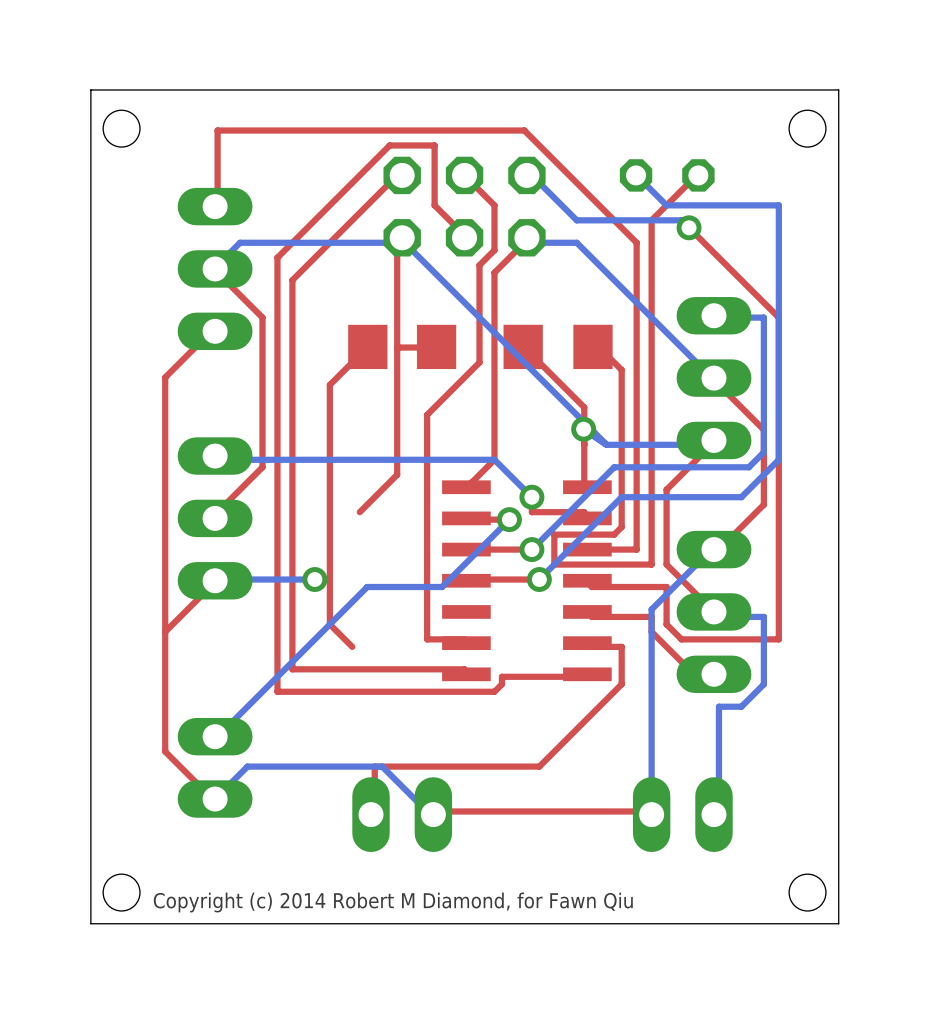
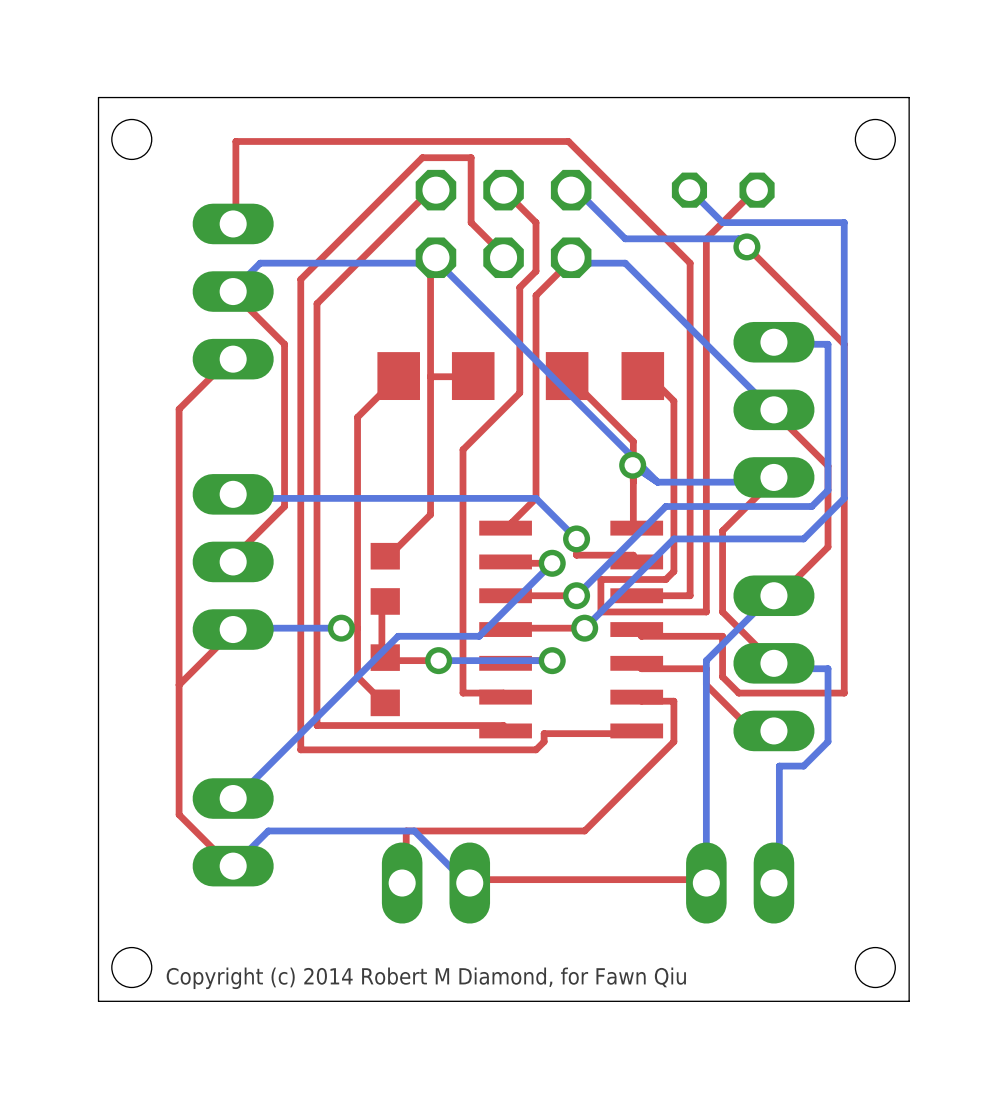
part: none -> (385, 578)
top track: none -> (385, 601) (381, 603) (381, 652) (385, 657) (390, 660) (438, 660)
via: none -> (438, 660)
bottom track: none -> (552, 660) (438, 660)
via: none -> (552, 660)
part: none -> (385, 680)

